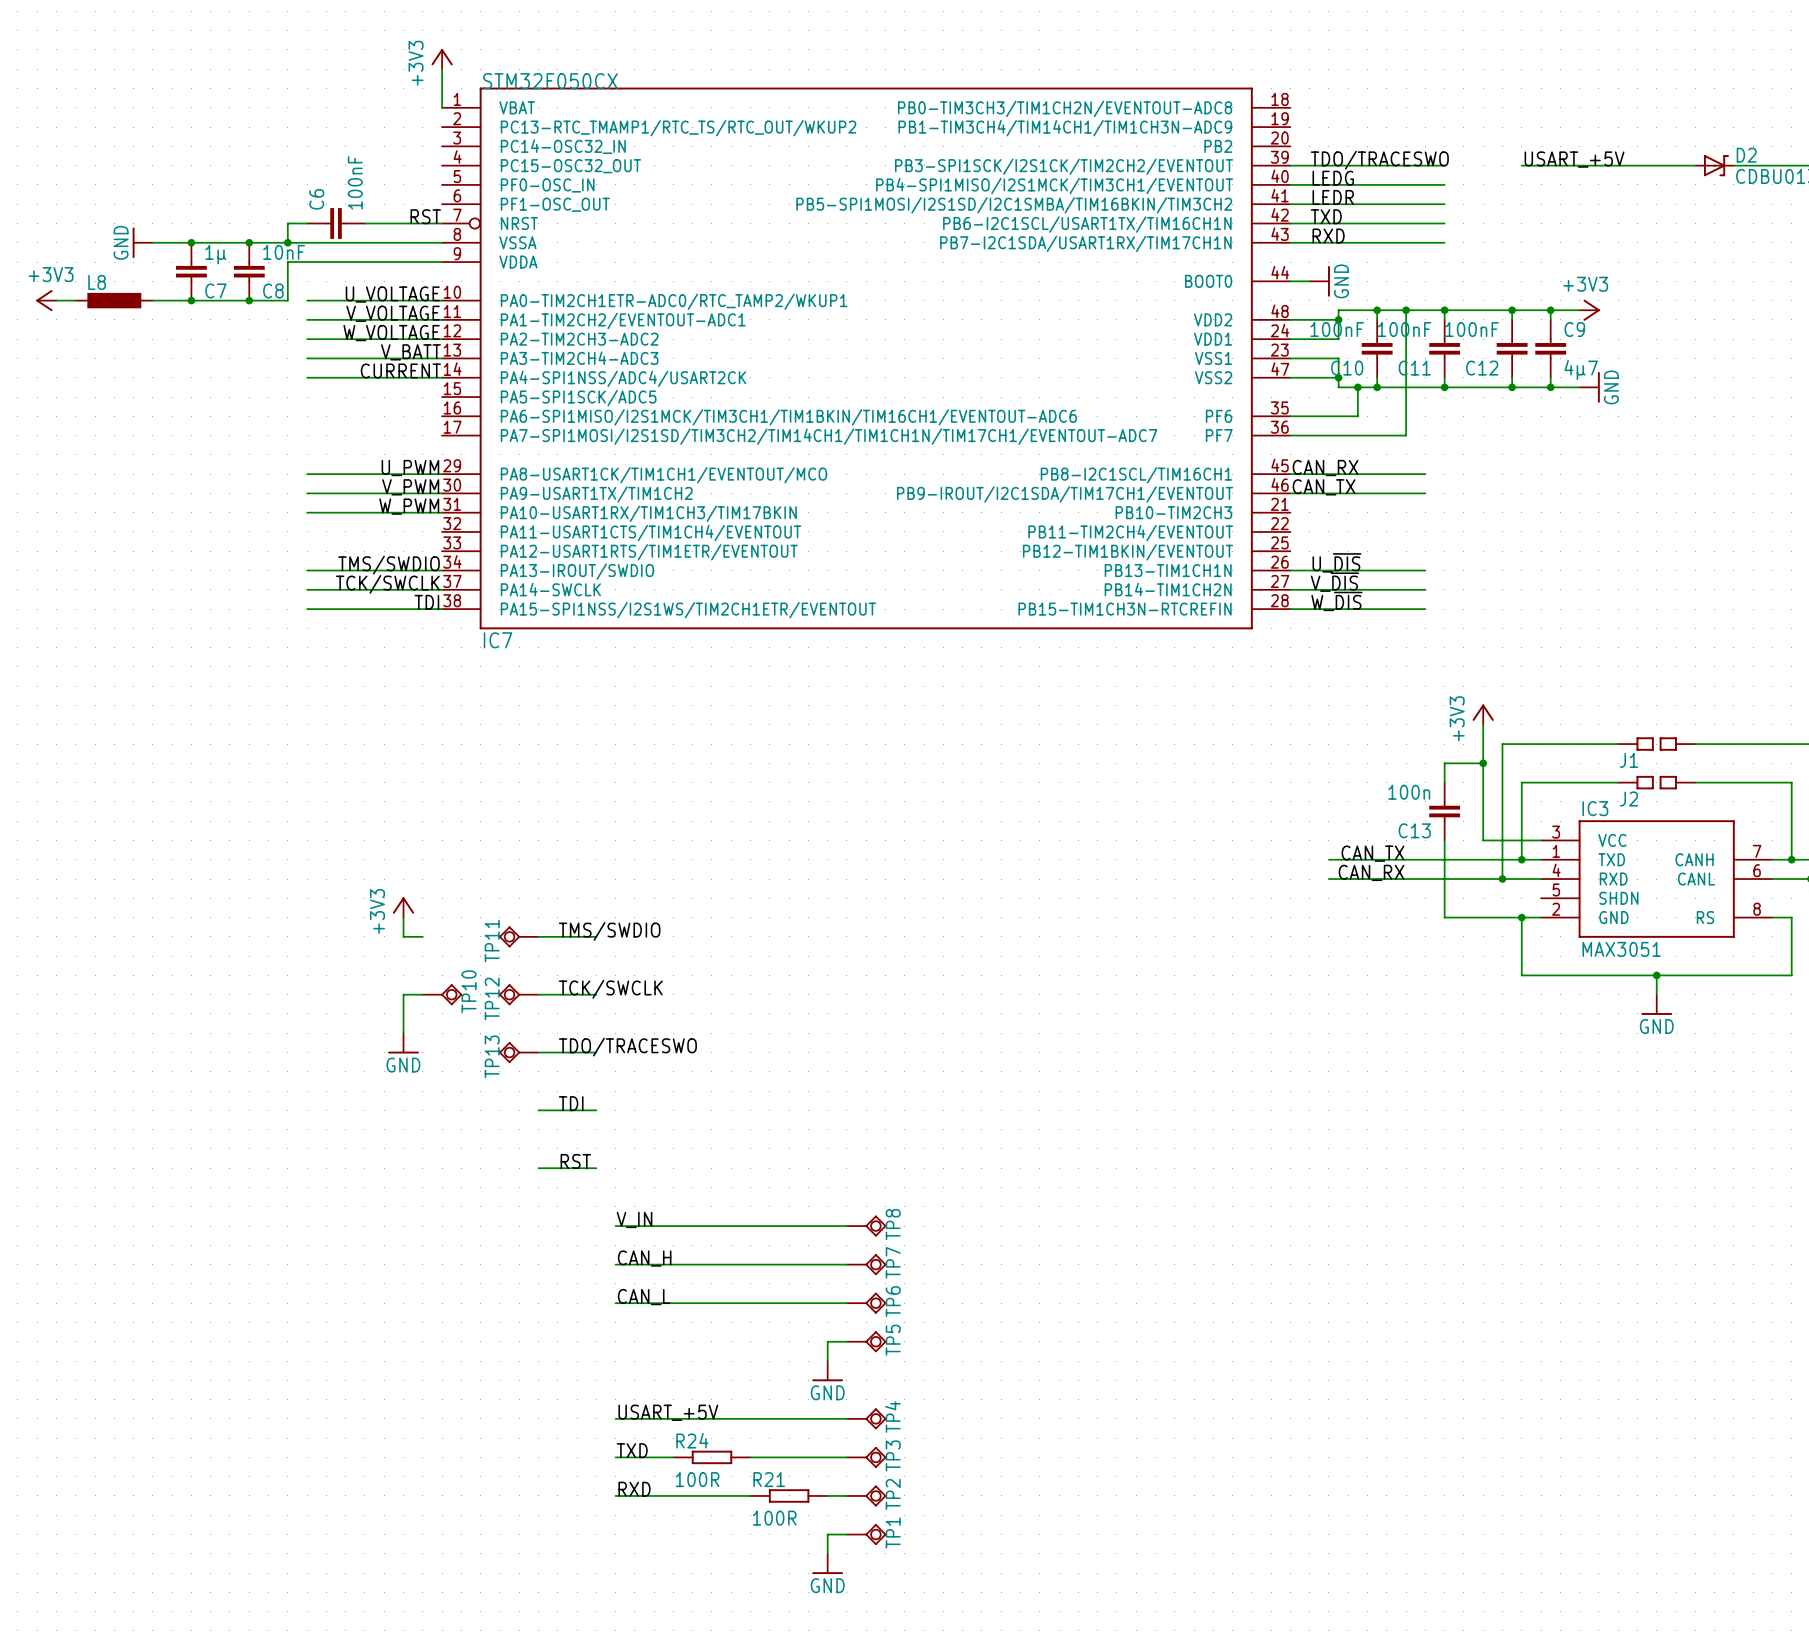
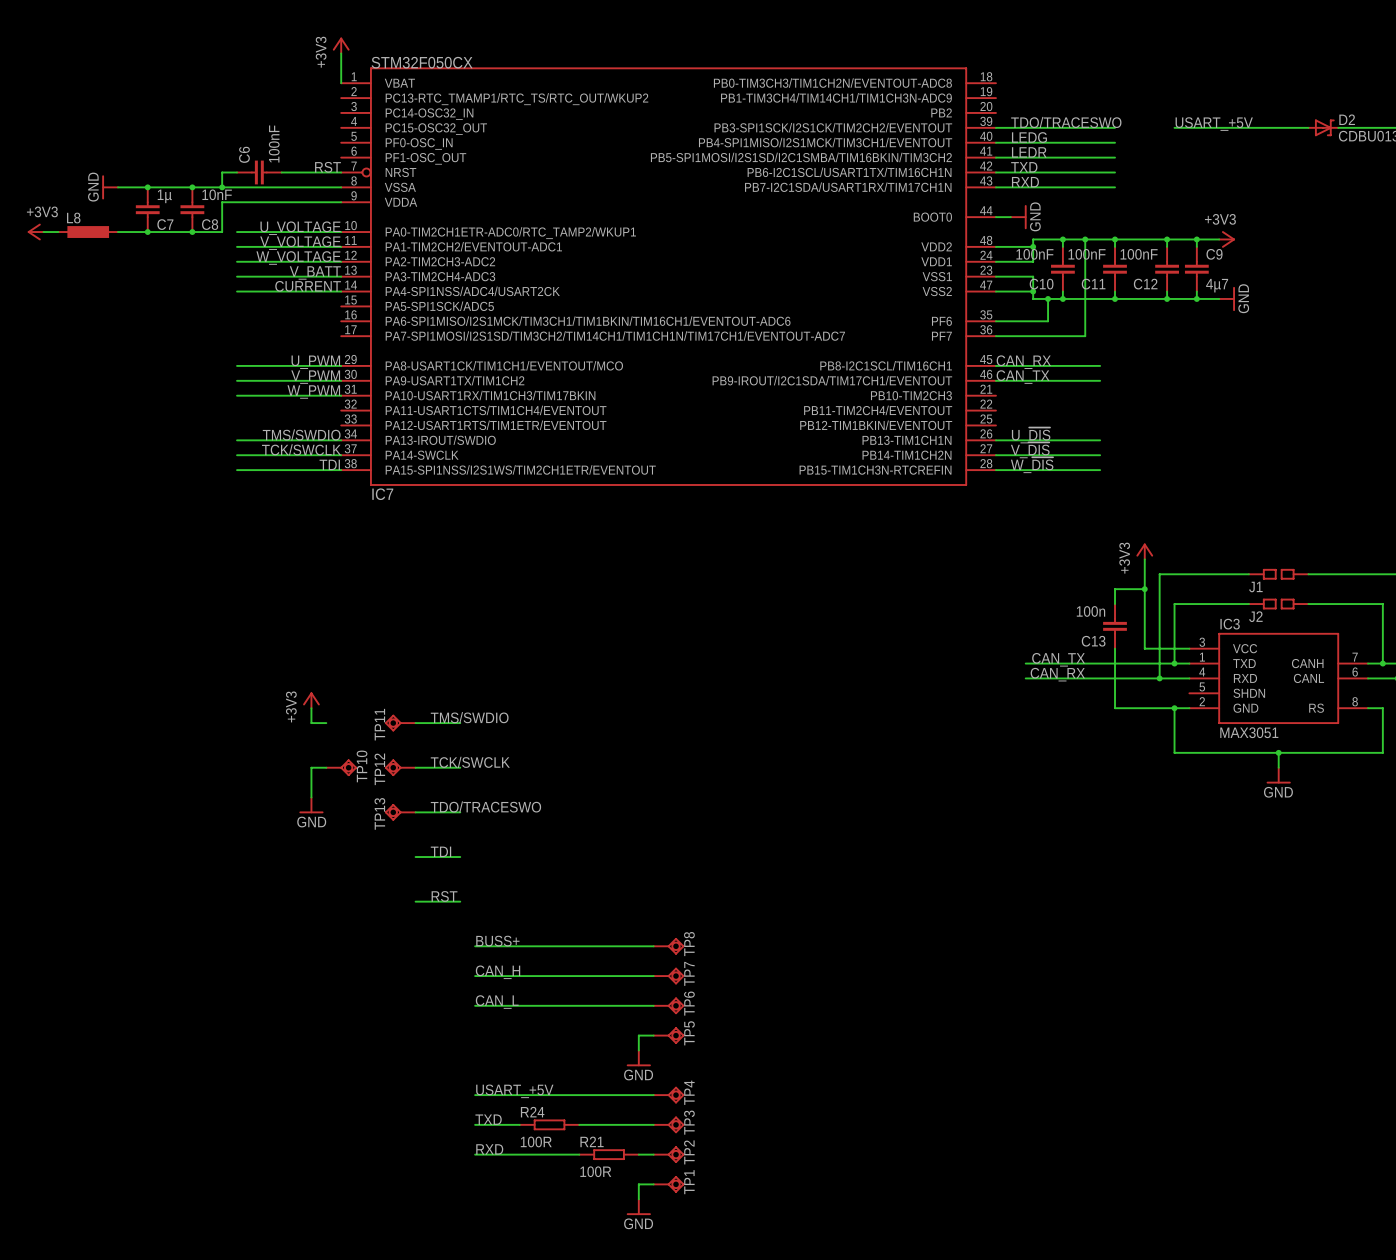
label: V_IN (634, 1219) -> BUSS+ (497, 941)

